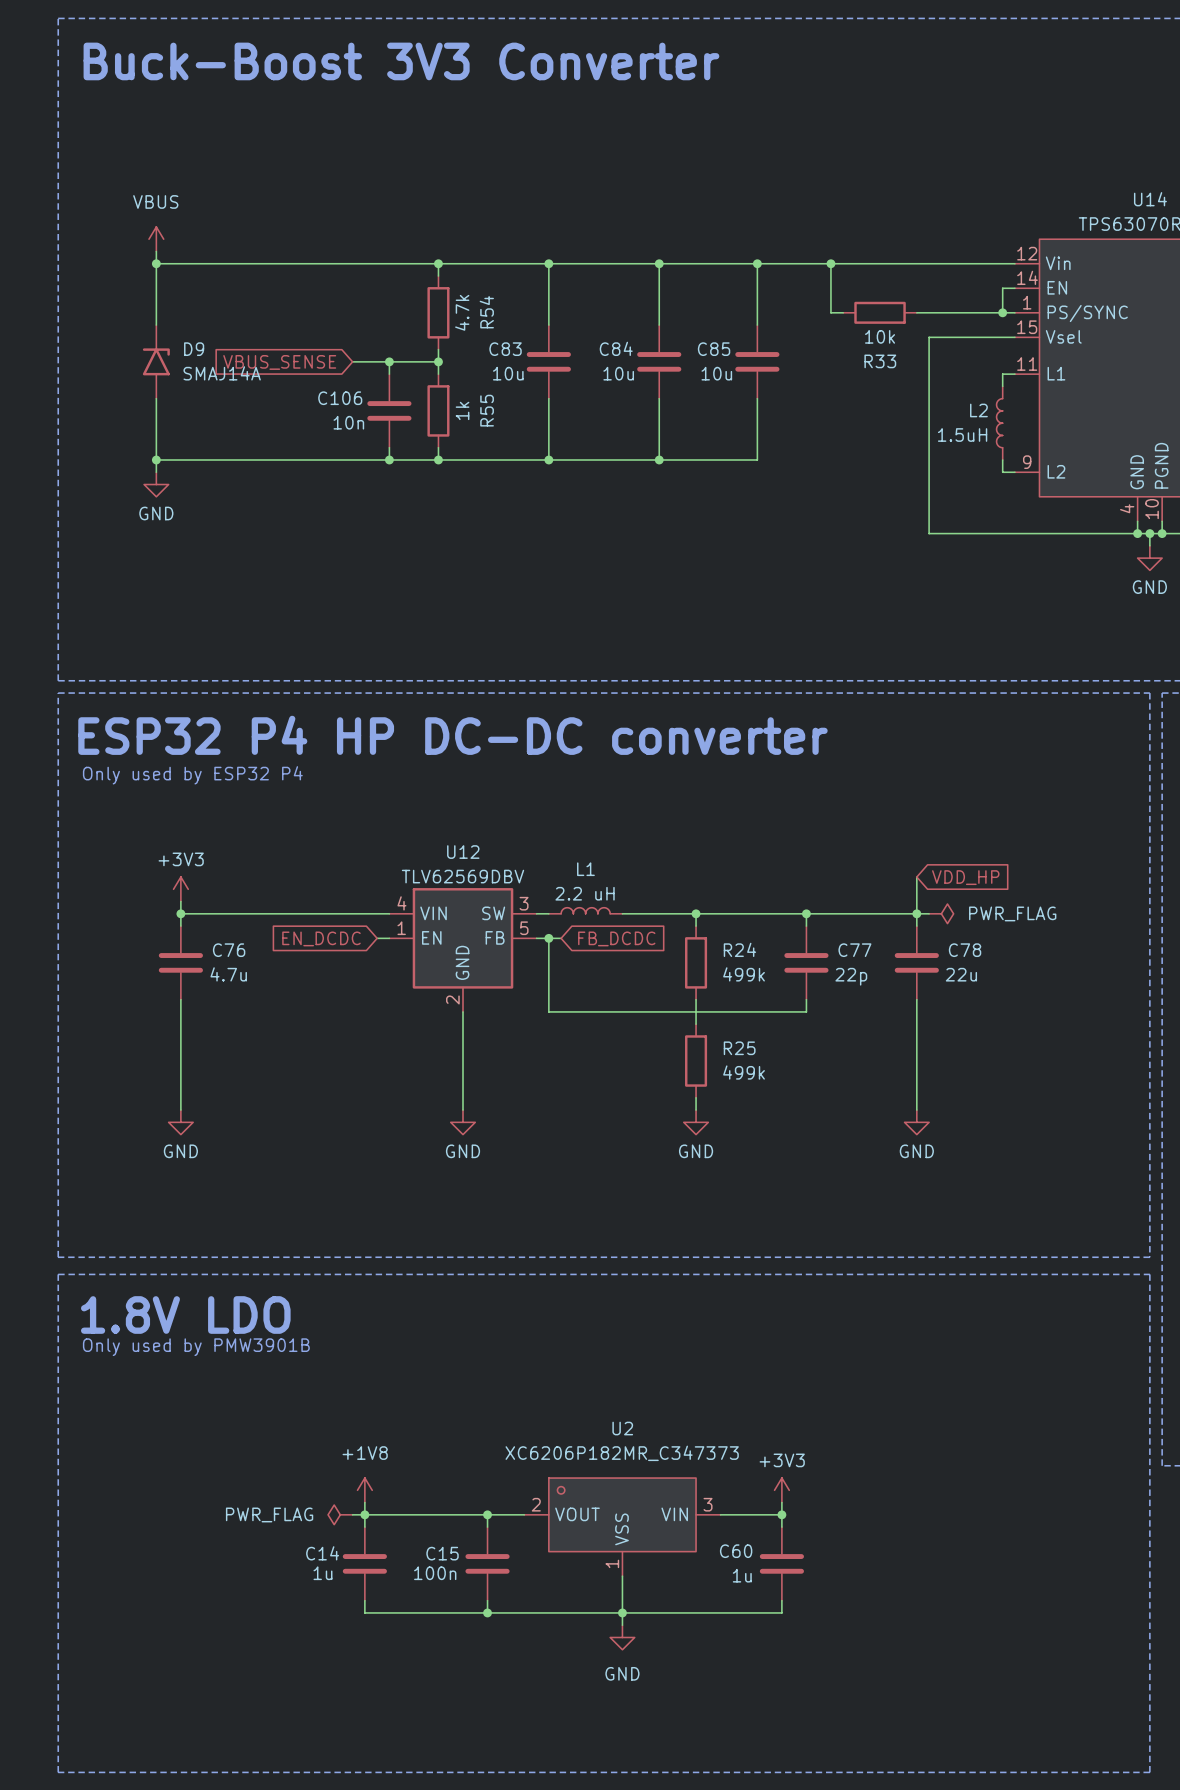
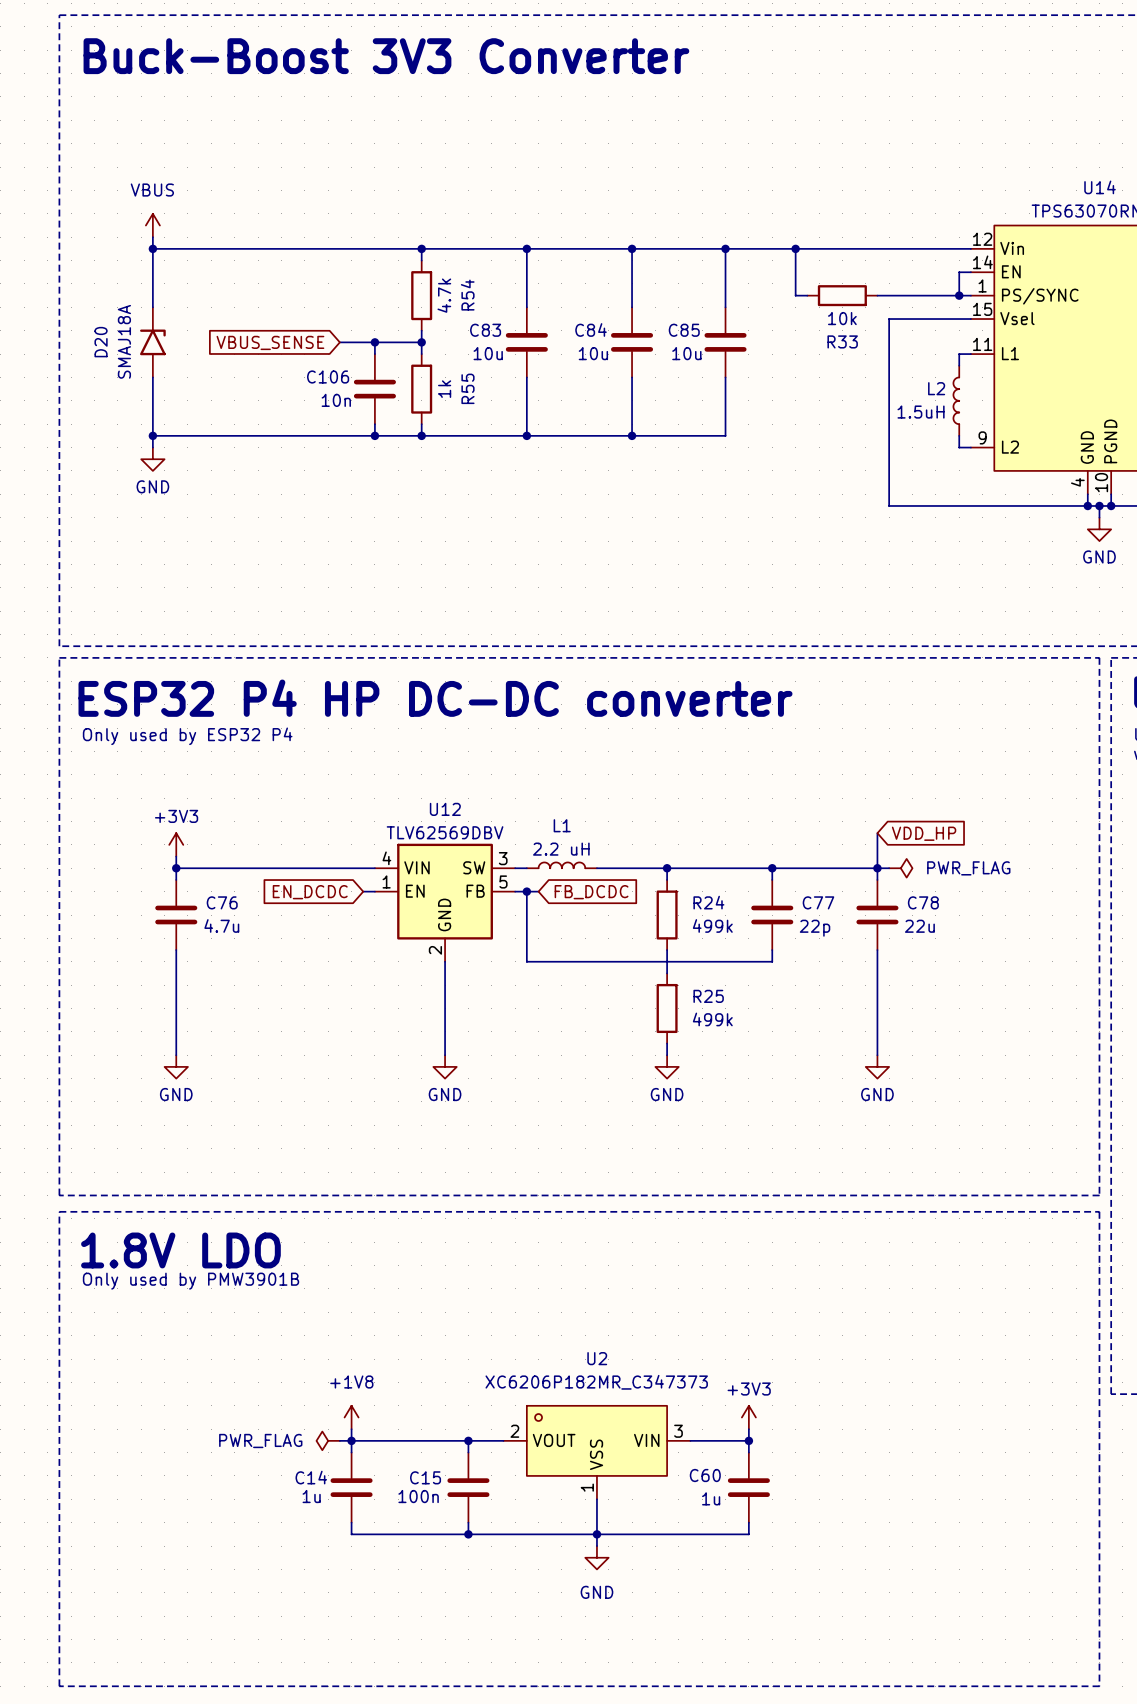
D9 name: D9 (194, 349) -> D20 (101, 342)
D9 value: SMAJ14A (222, 373) -> SMAJ18A (124, 341)

